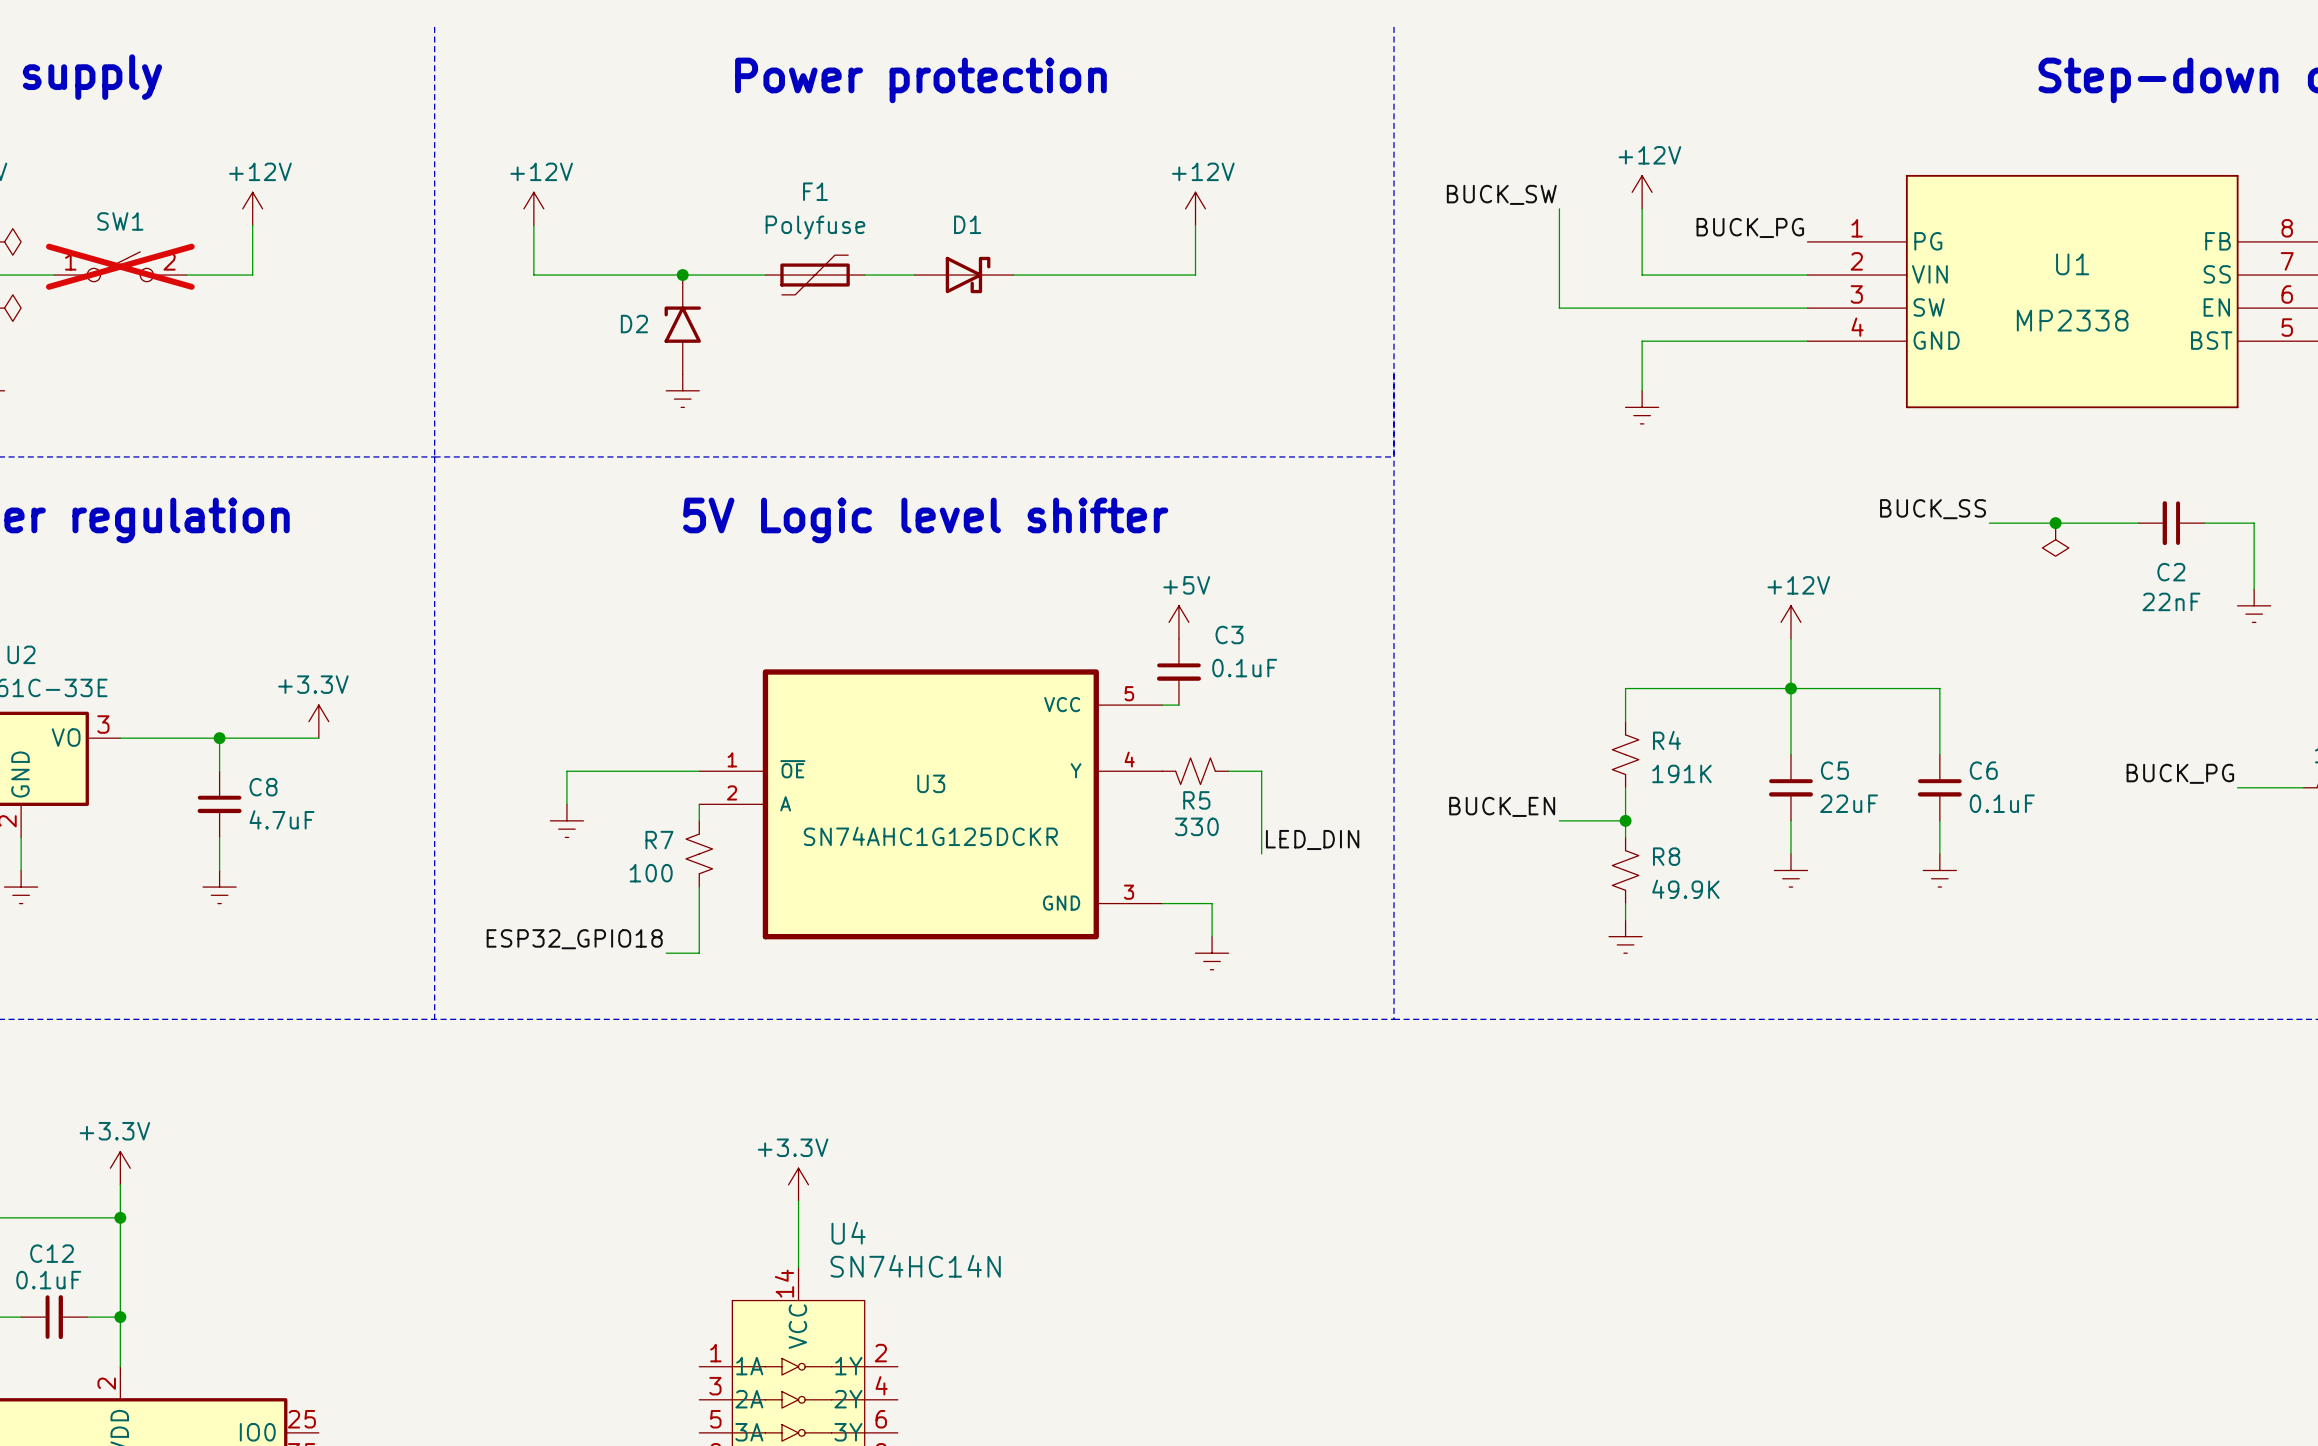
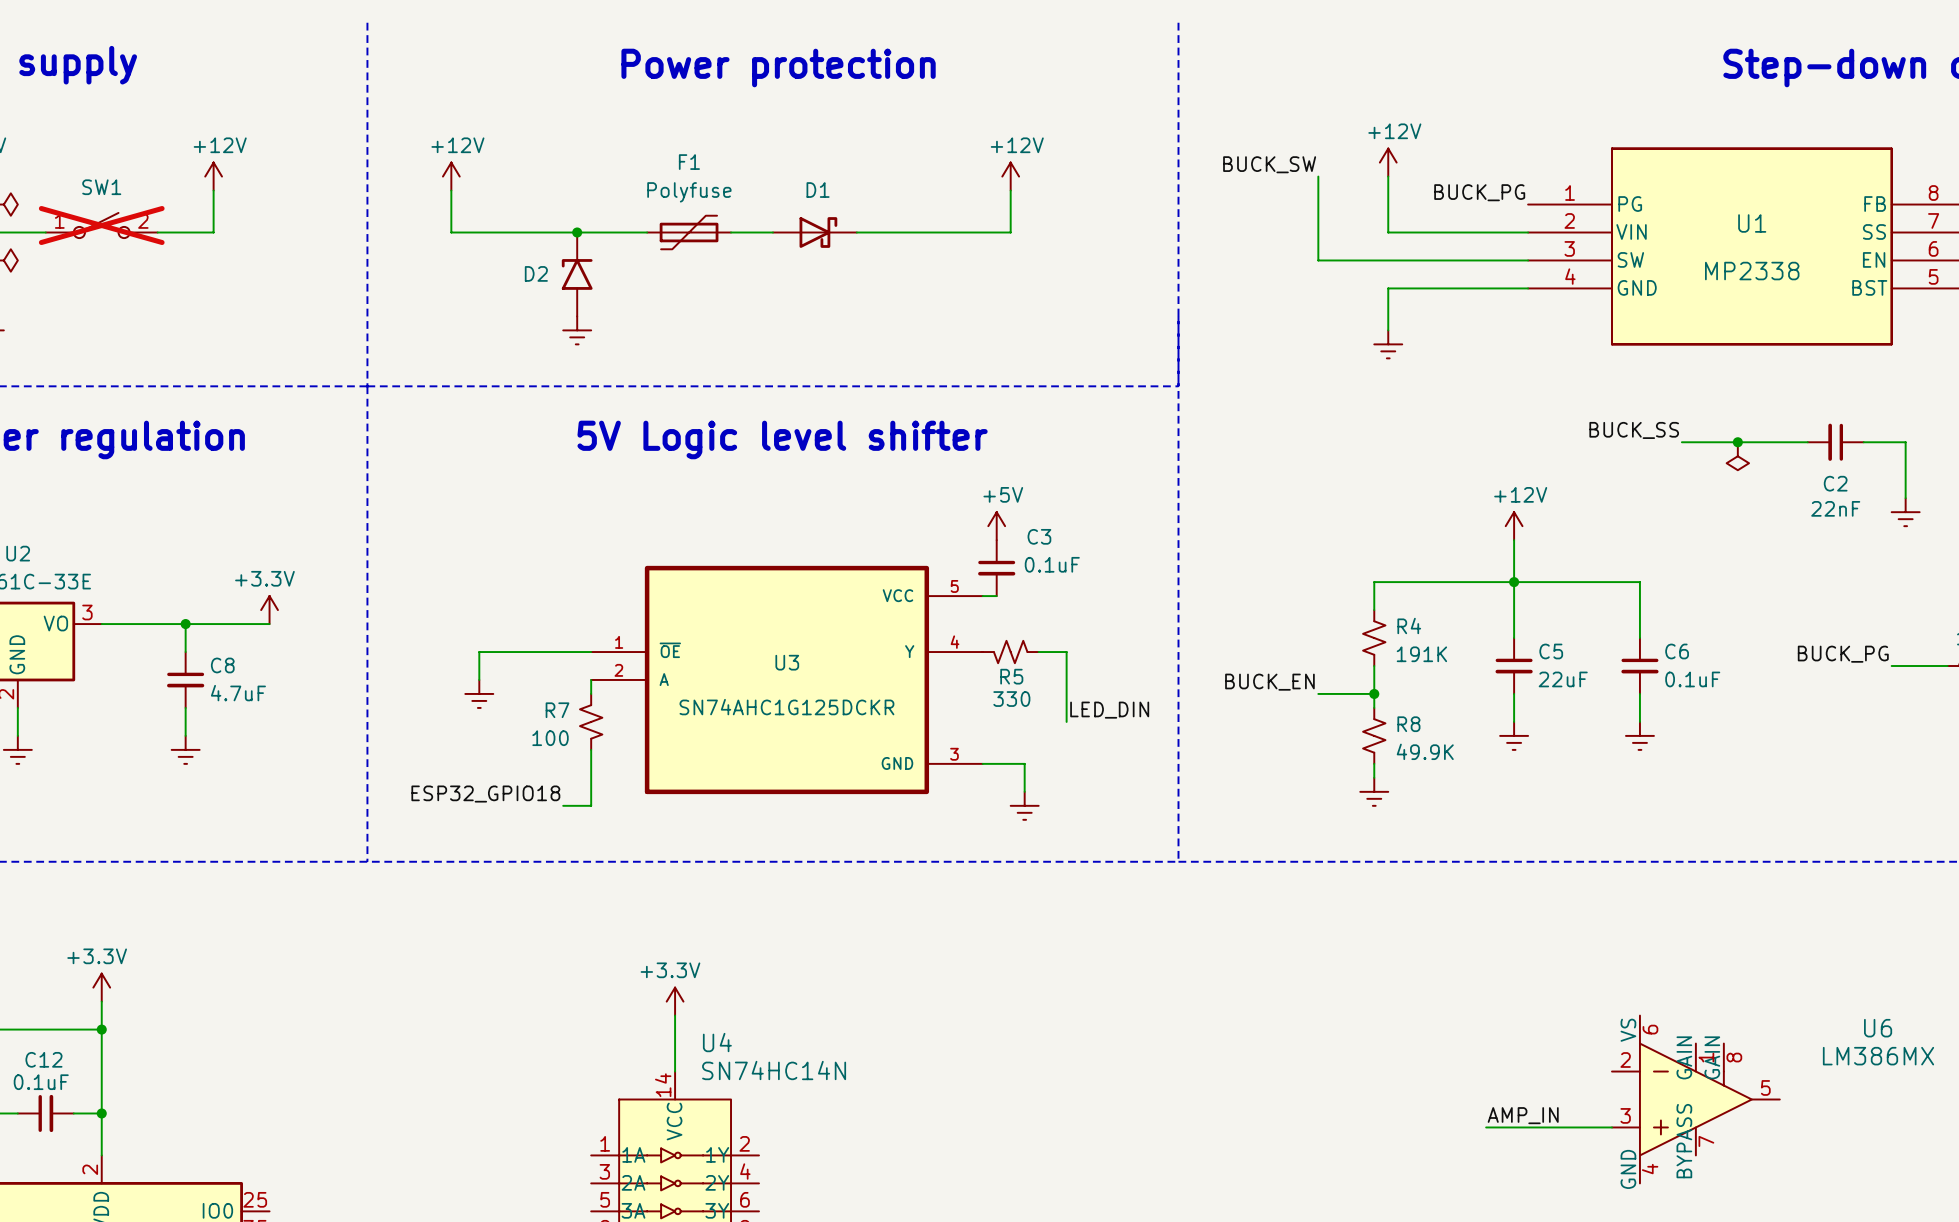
U6: none -> LM386MX (1695, 1099)
label: none -> AMP_IN (1523, 1115)
wire: none -> (1486, 1127) (1611, 1127)

